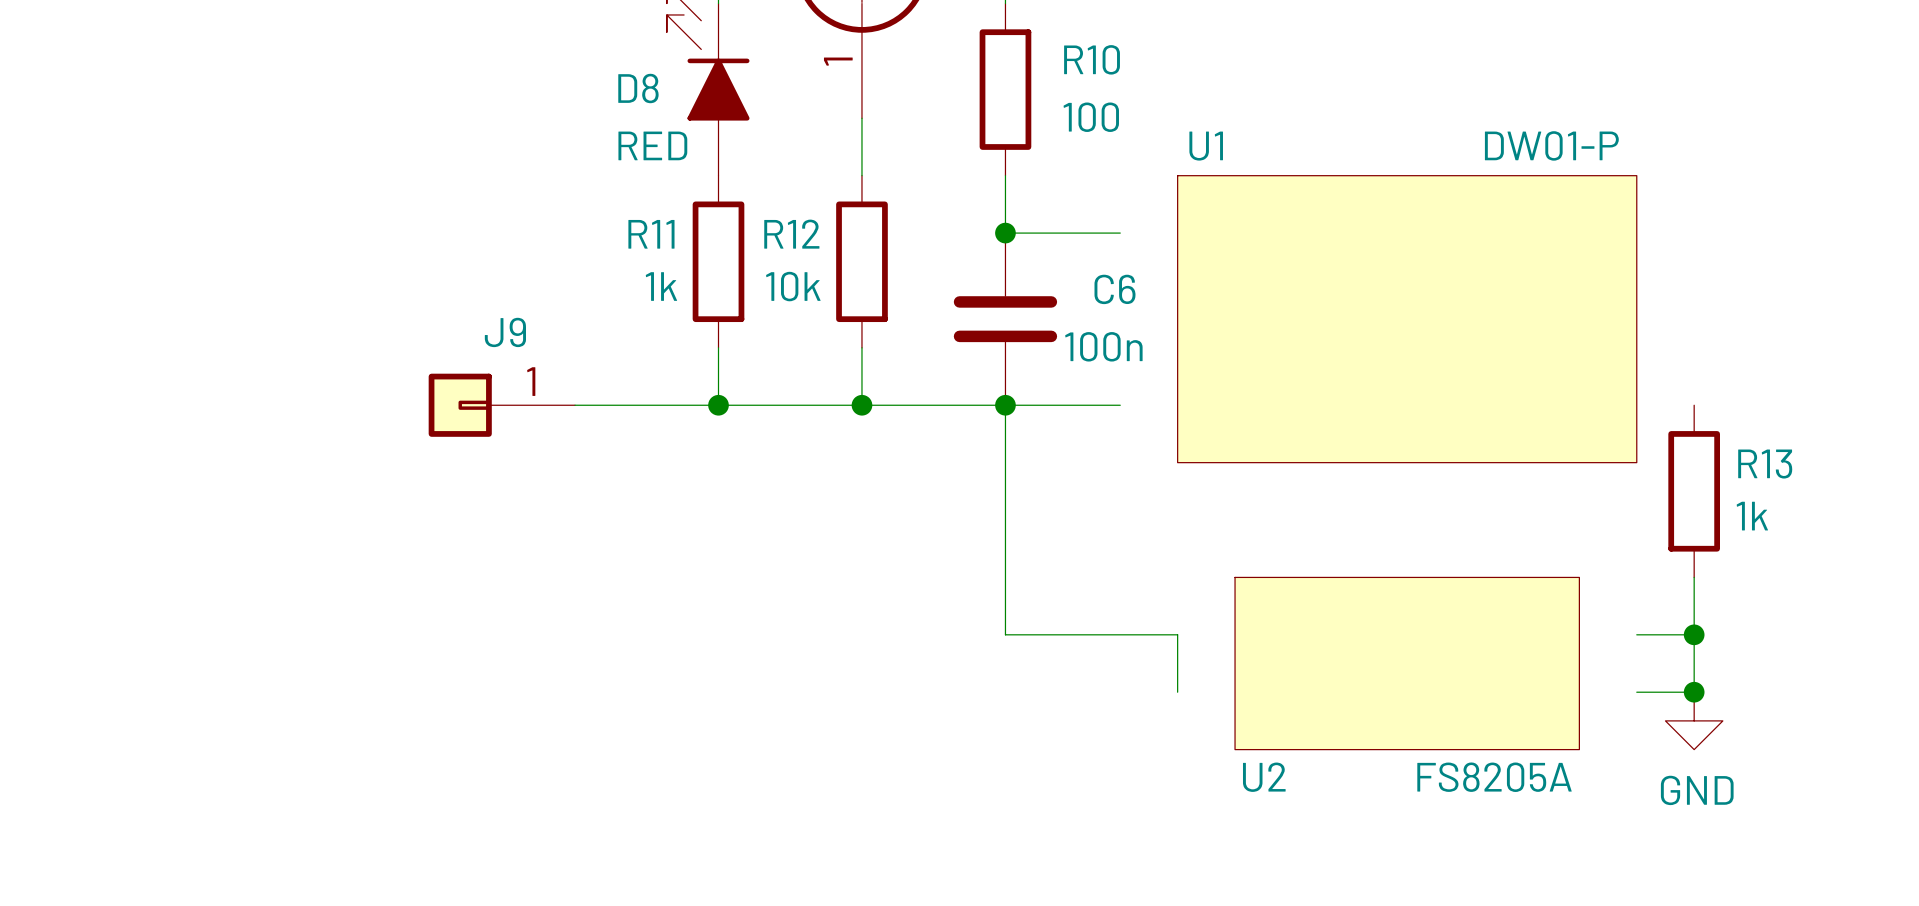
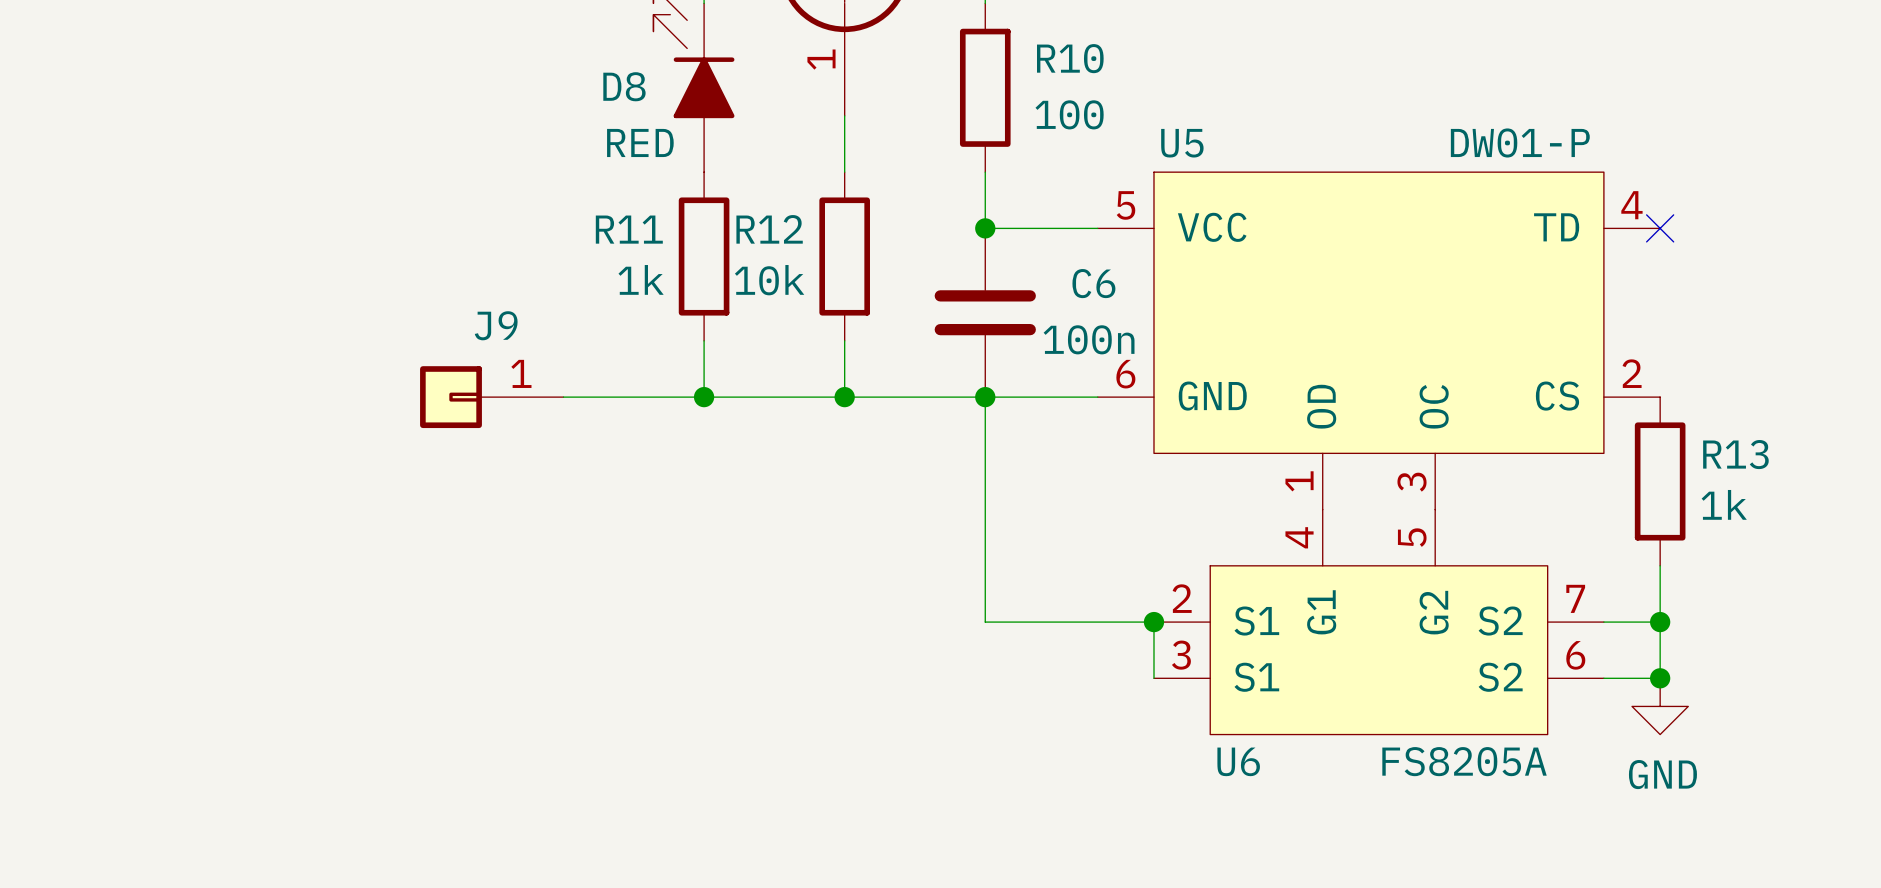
no-connect mark: none -> (1660, 228)
U1: DW01-P (1407, 319) -> none
U5: none -> DW01-P (1378, 340)
junction: none -> (1153, 622)
U6: none -> FS8205A (1378, 622)
U2: FS8205A (1407, 663) -> none

